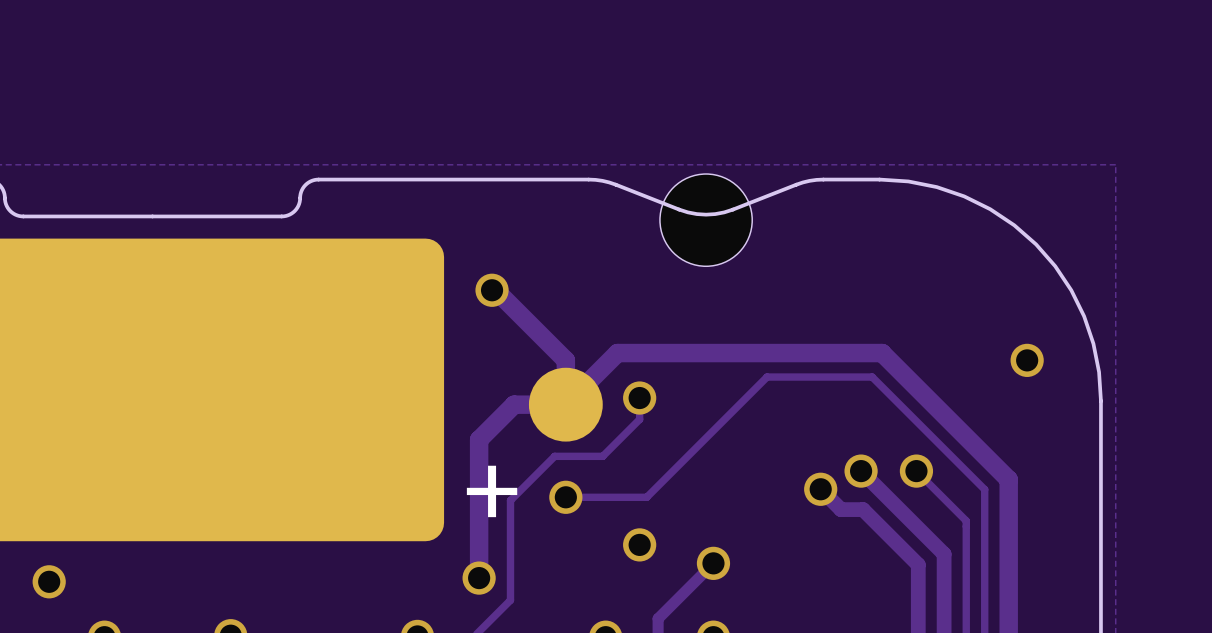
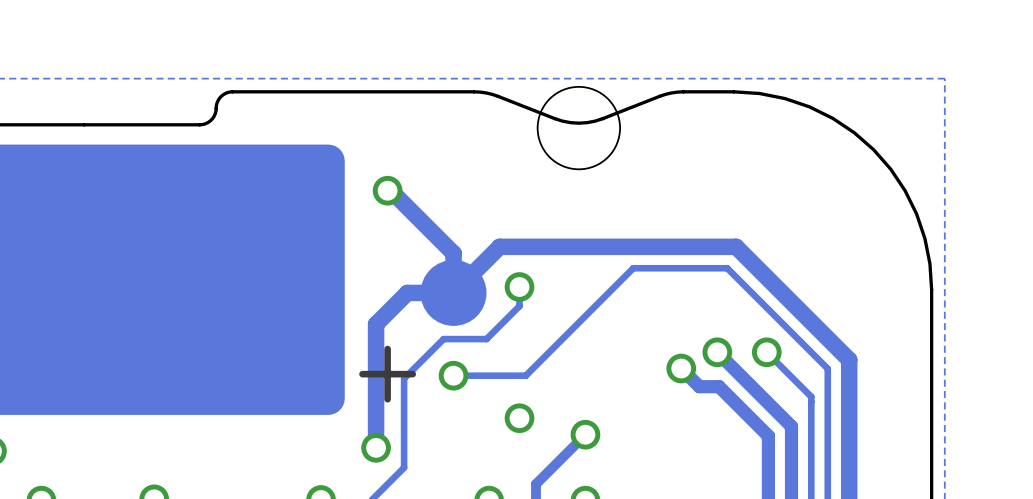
via: (1027, 360) -> none

